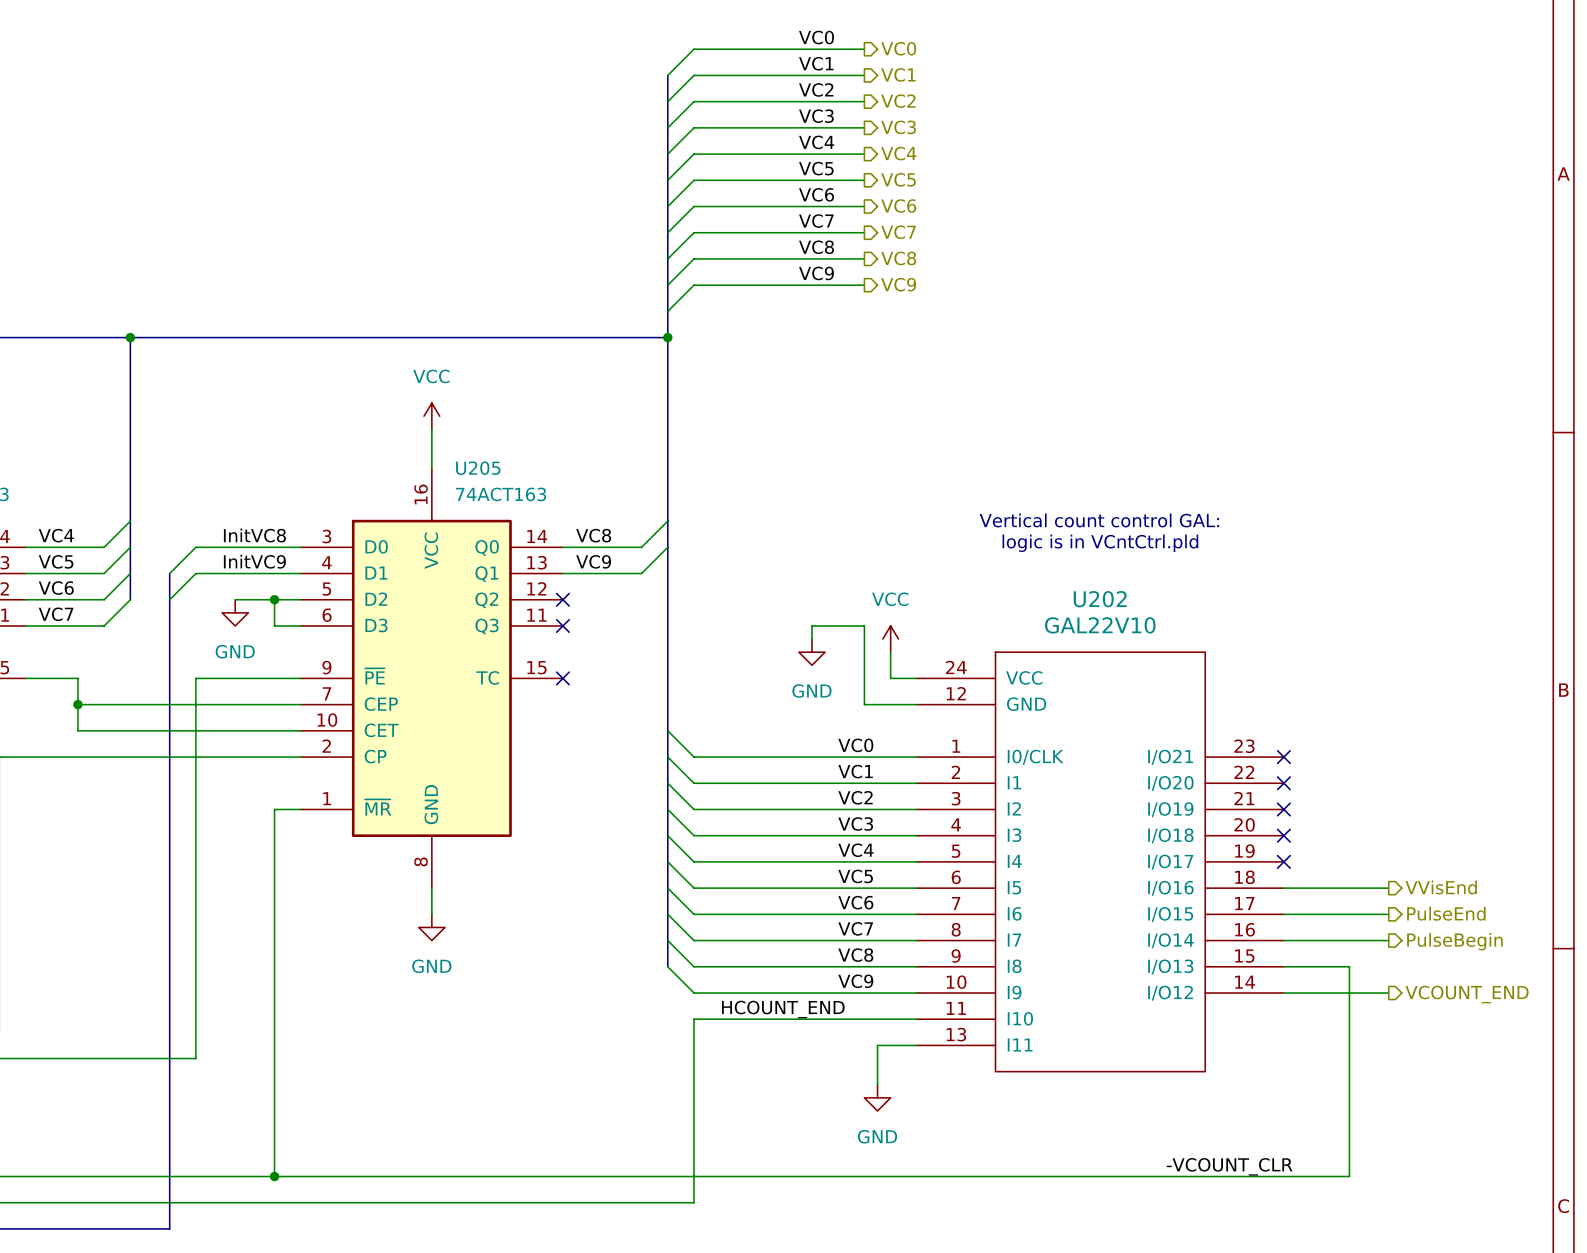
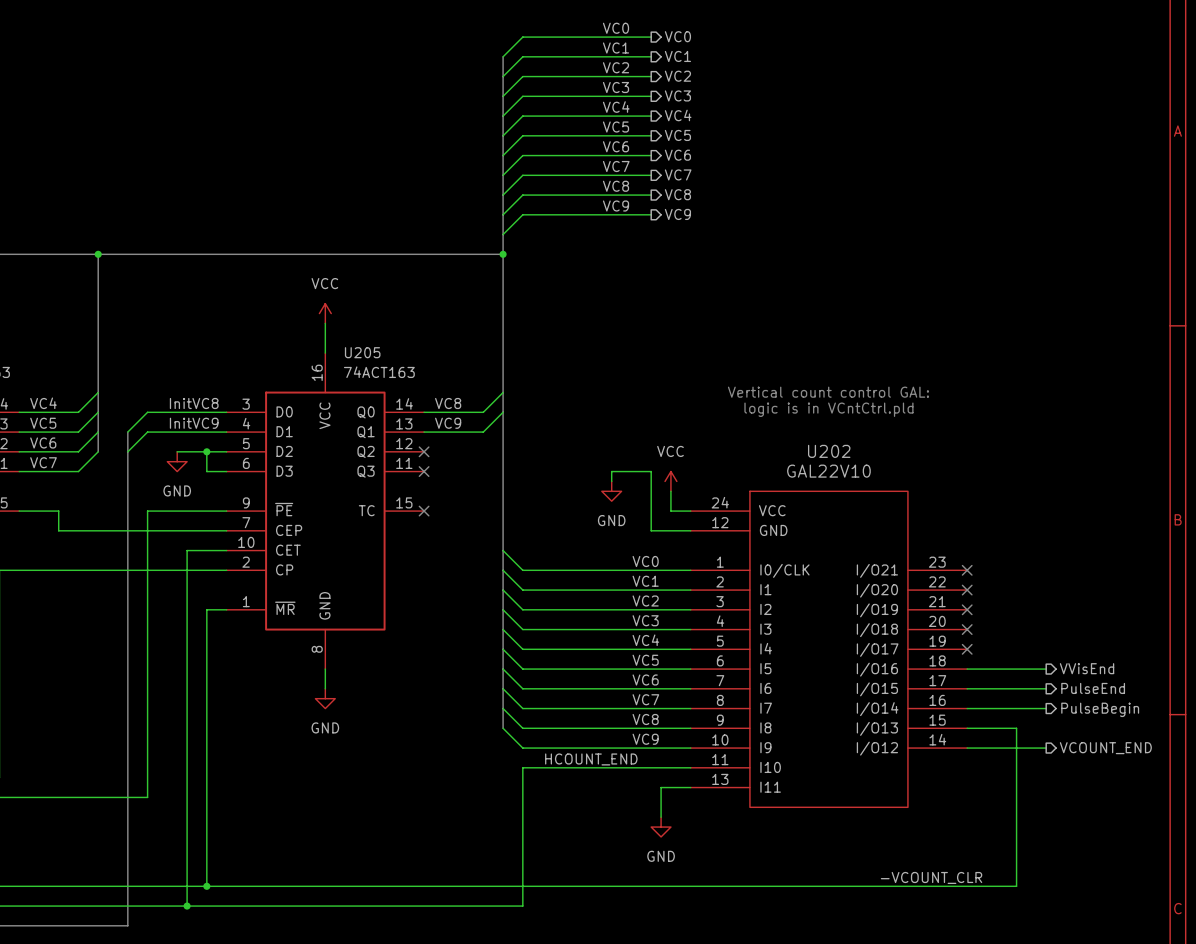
wire: (77, 704) (77, 730) (248, 730) -> (187, 906) (187, 550)
junction: (77, 704) -> none
junction: none -> (187, 906)

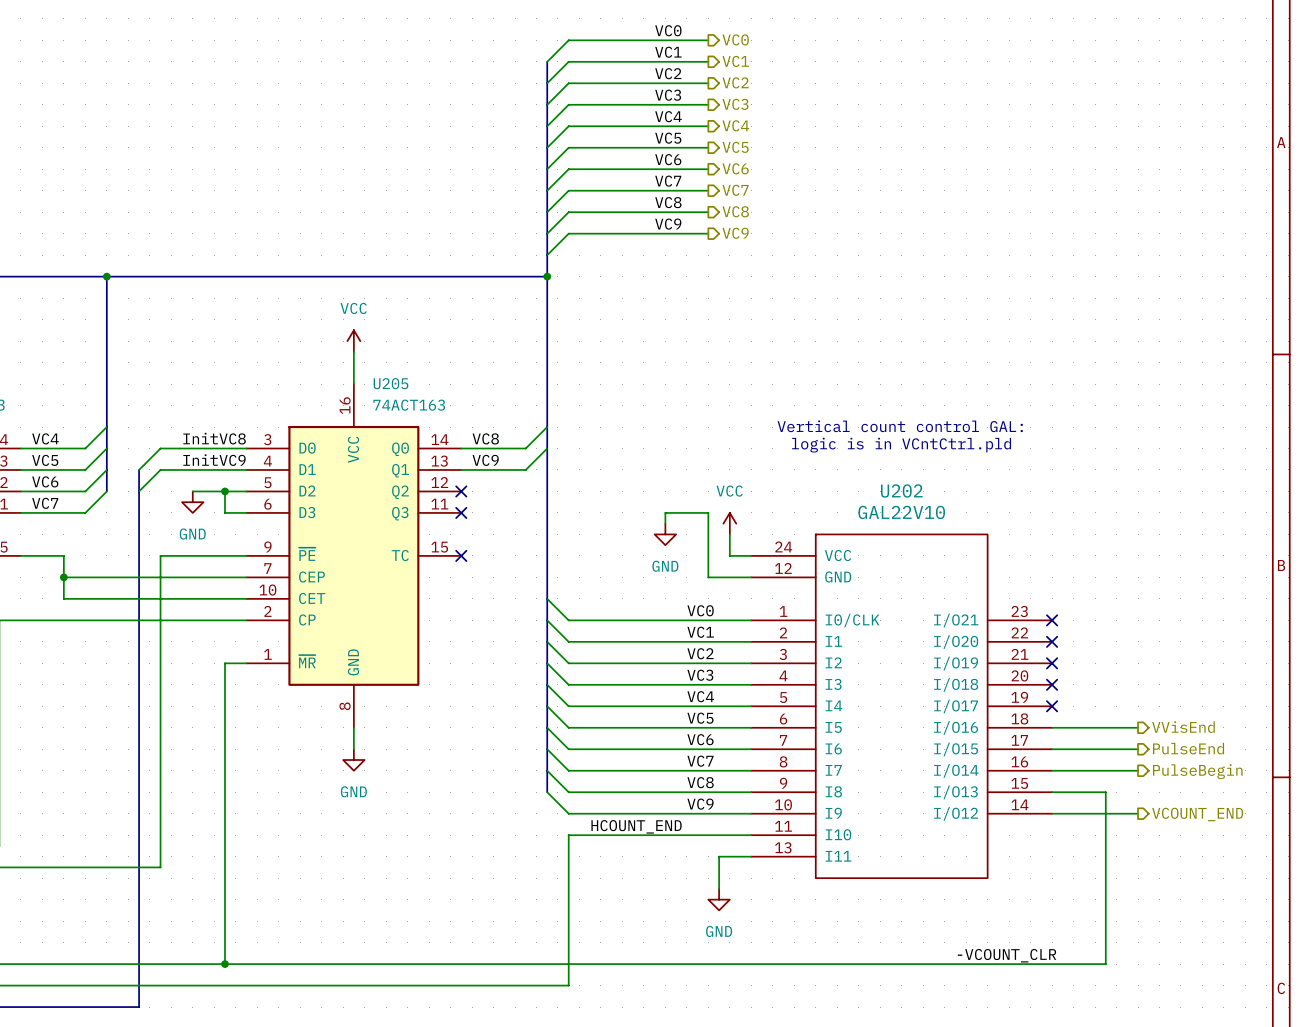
junction: none -> (63, 577)
wire: (187, 550) (187, 906) -> (203, 598) (63, 598) (63, 577)
junction: (187, 906) -> none

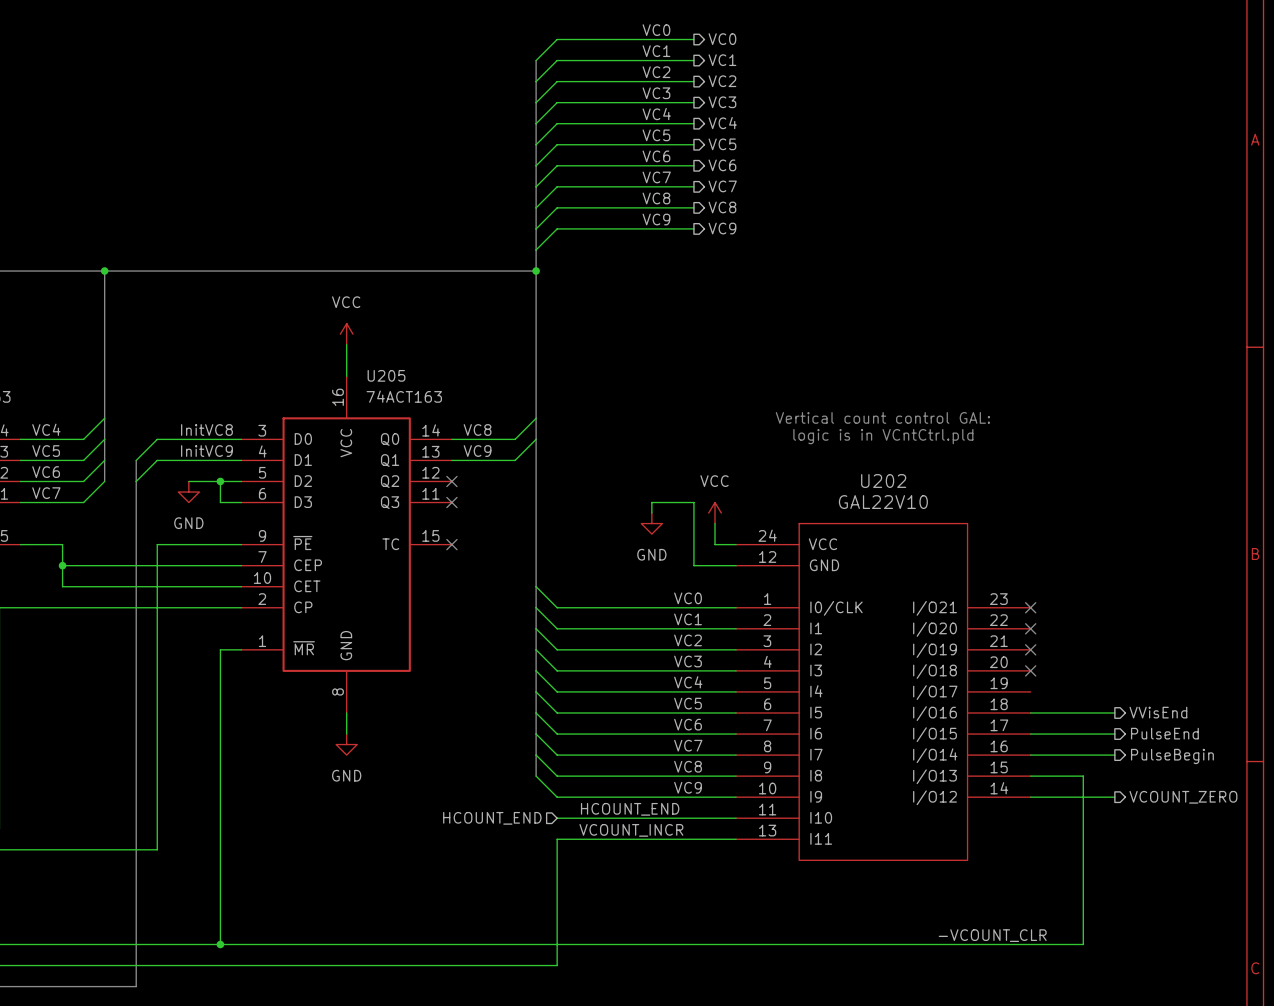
no-connect mark: (1052, 706) -> none
hierarchical label: VCOUNT_END (1197, 814) -> VCOUNT_ZERO (1183, 797)
wire: (568, 835) (568, 856) -> (704, 839) (557, 839)
hierarchical label: none -> HCOUNT_END (492, 818)
label: none -> VCOUNT_INCR (631, 830)
wire: (719, 856) (719, 888) -> none
power symbol: GND (719, 899) -> none

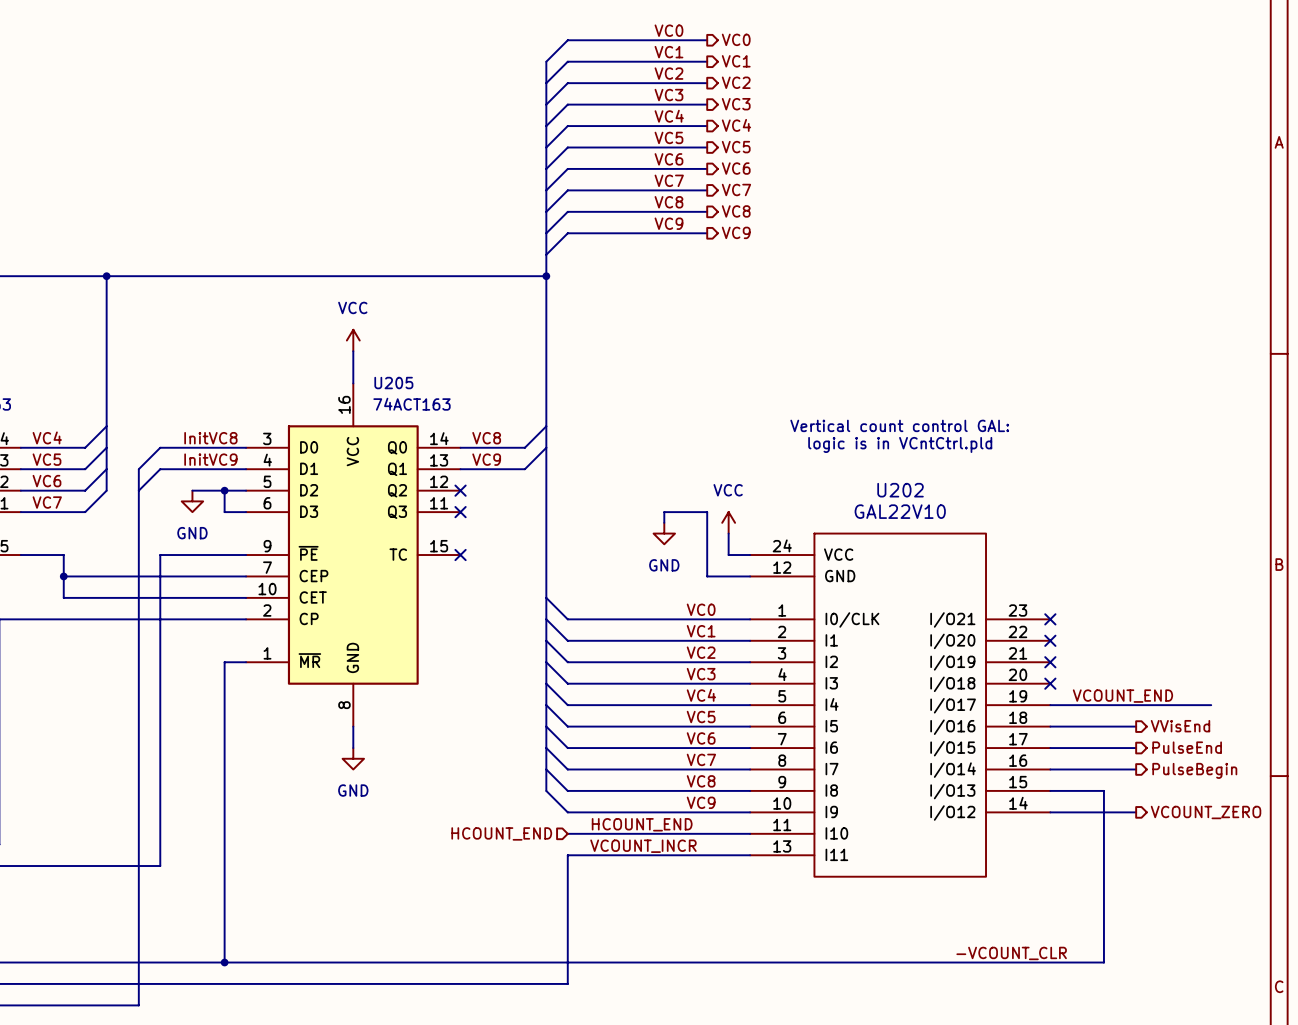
label: none -> VCOUNT_END (1122, 696)
wire: none -> (1050, 705) (1211, 705)

